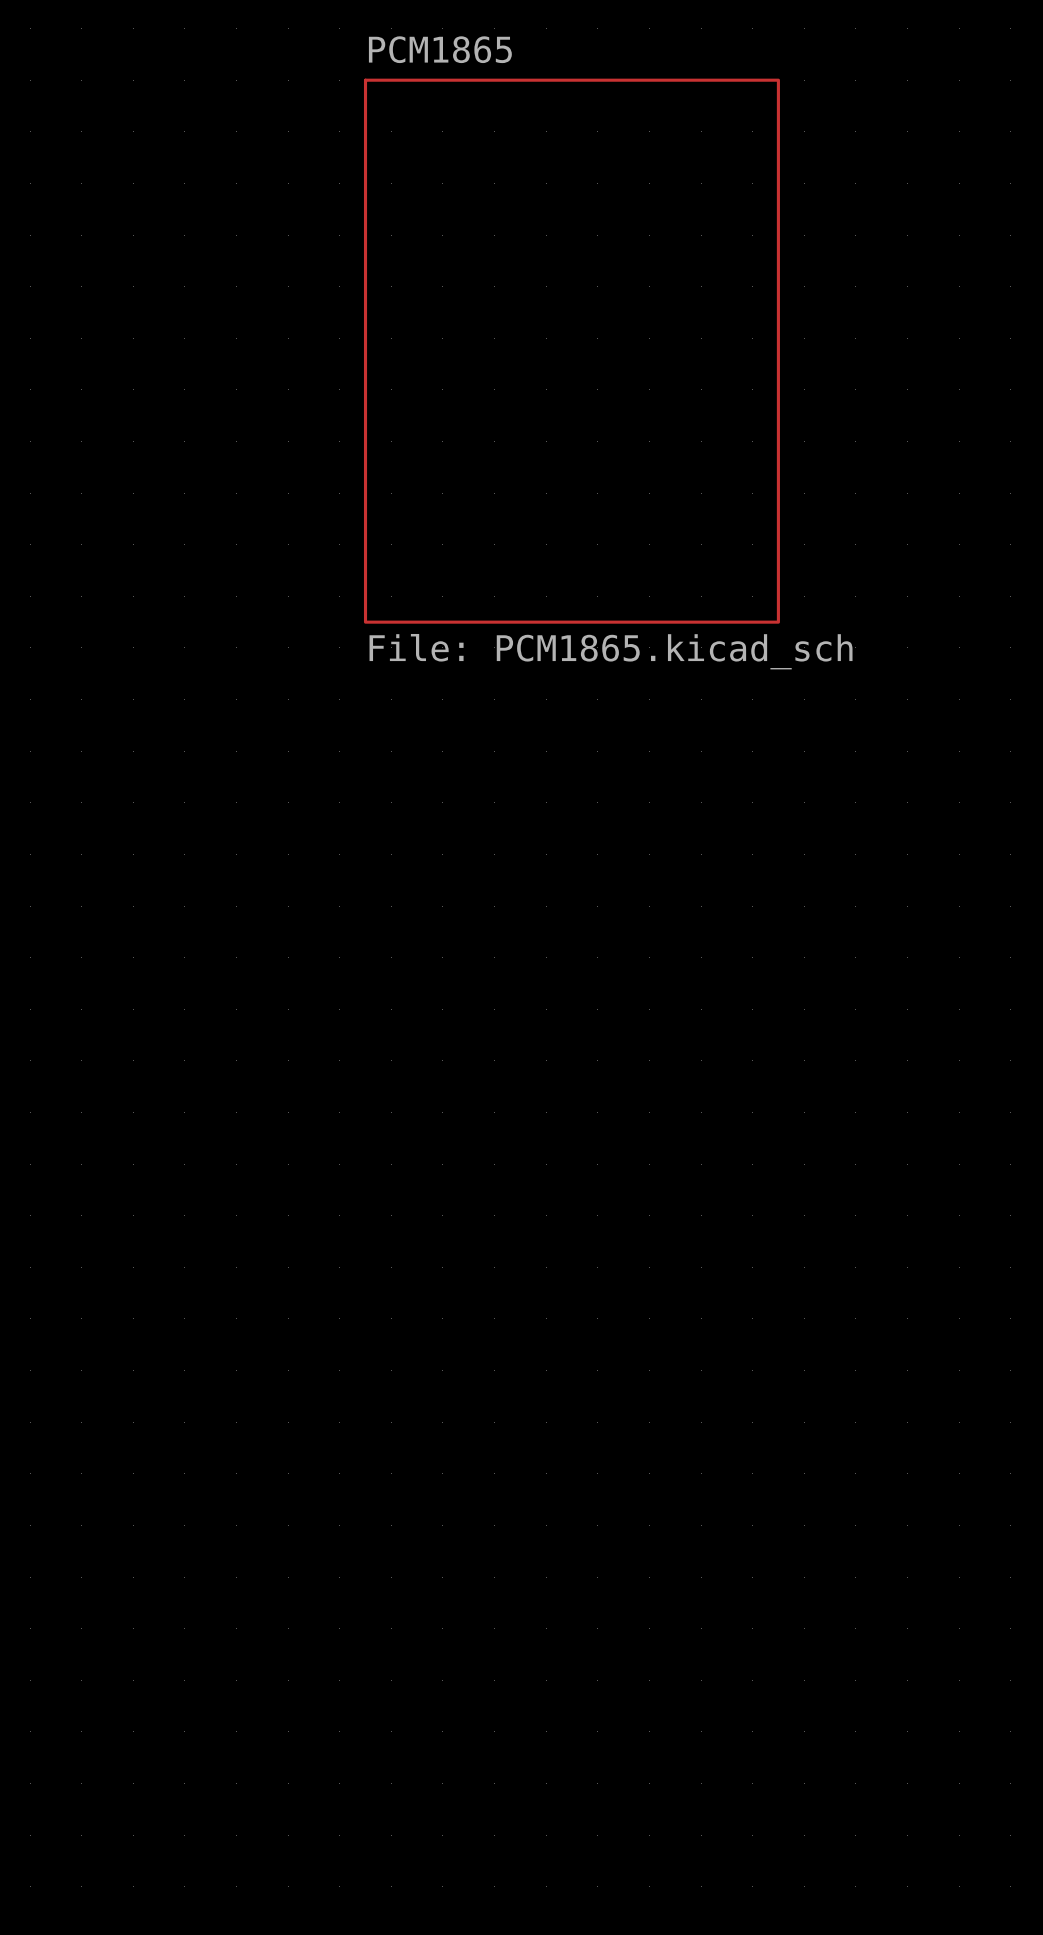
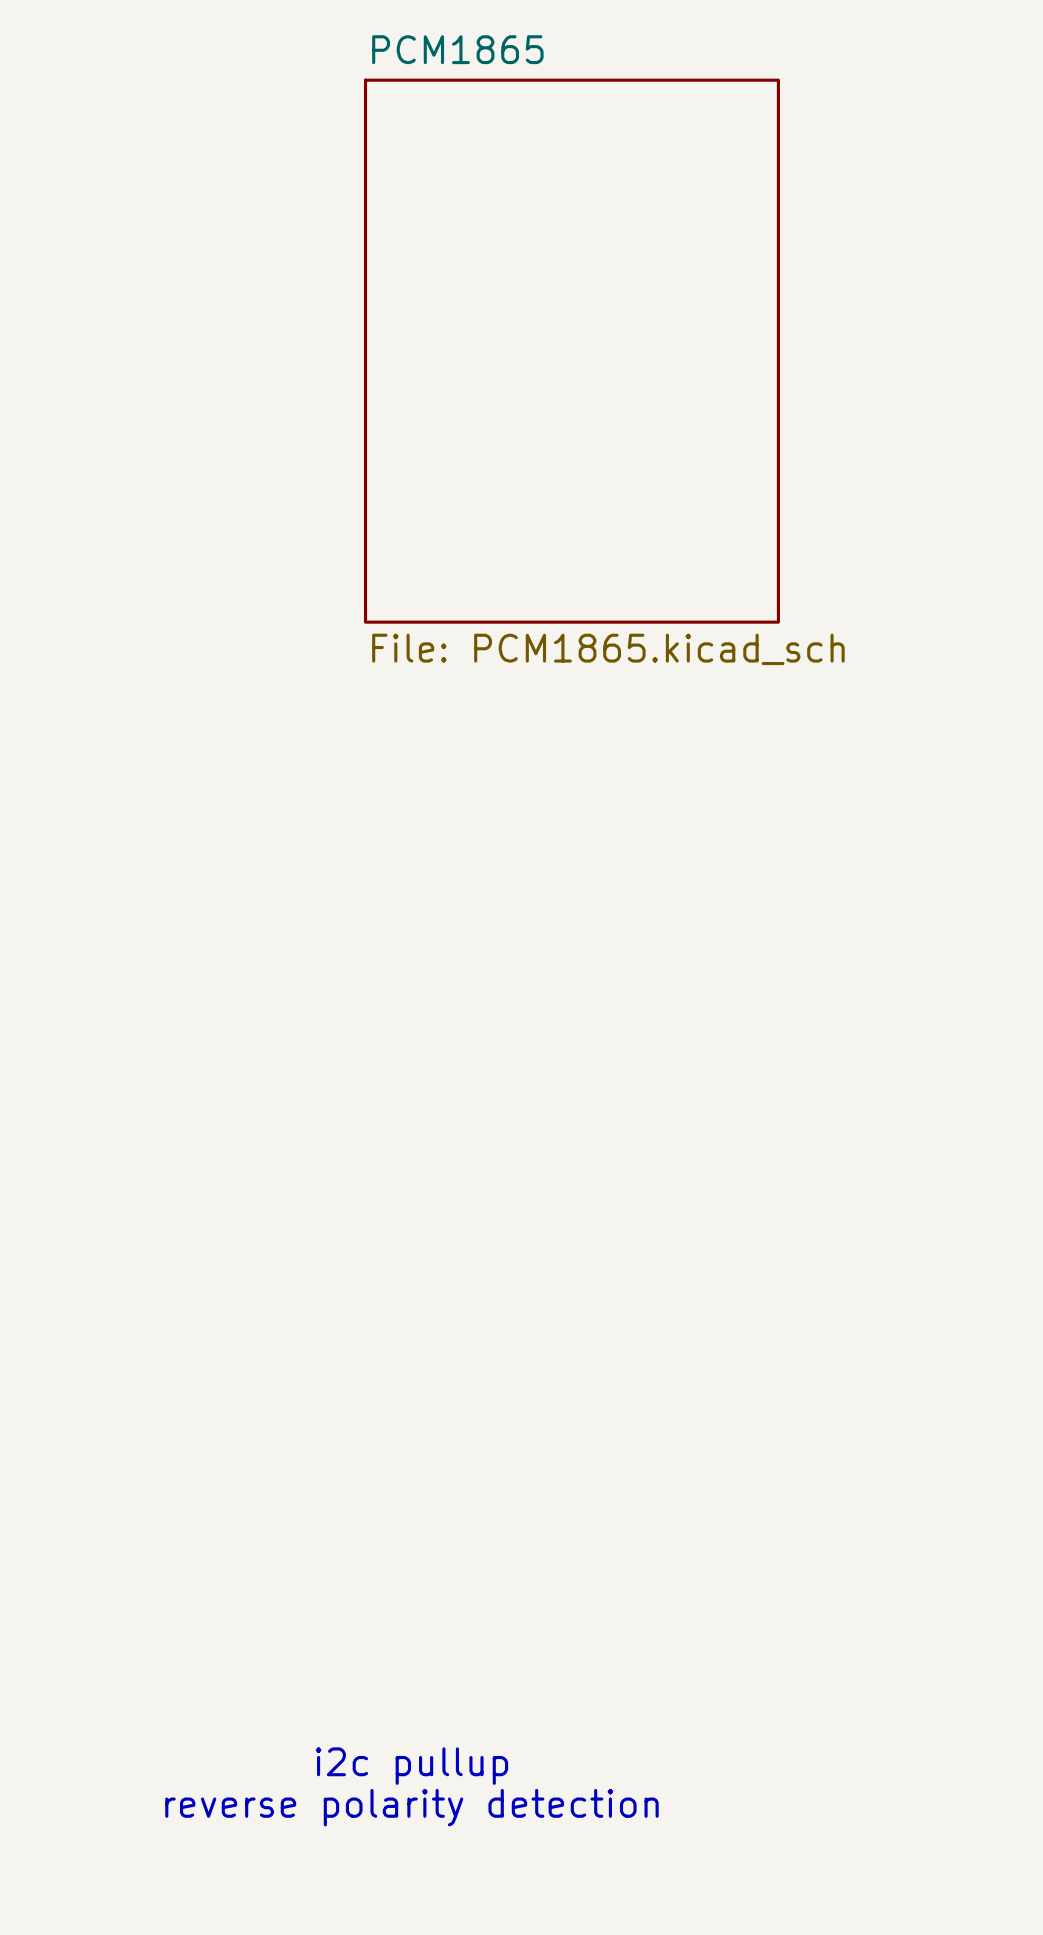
text: none -> i2c pullup (411, 1766)
text: none -> reverse polarity detection (411, 1807)

